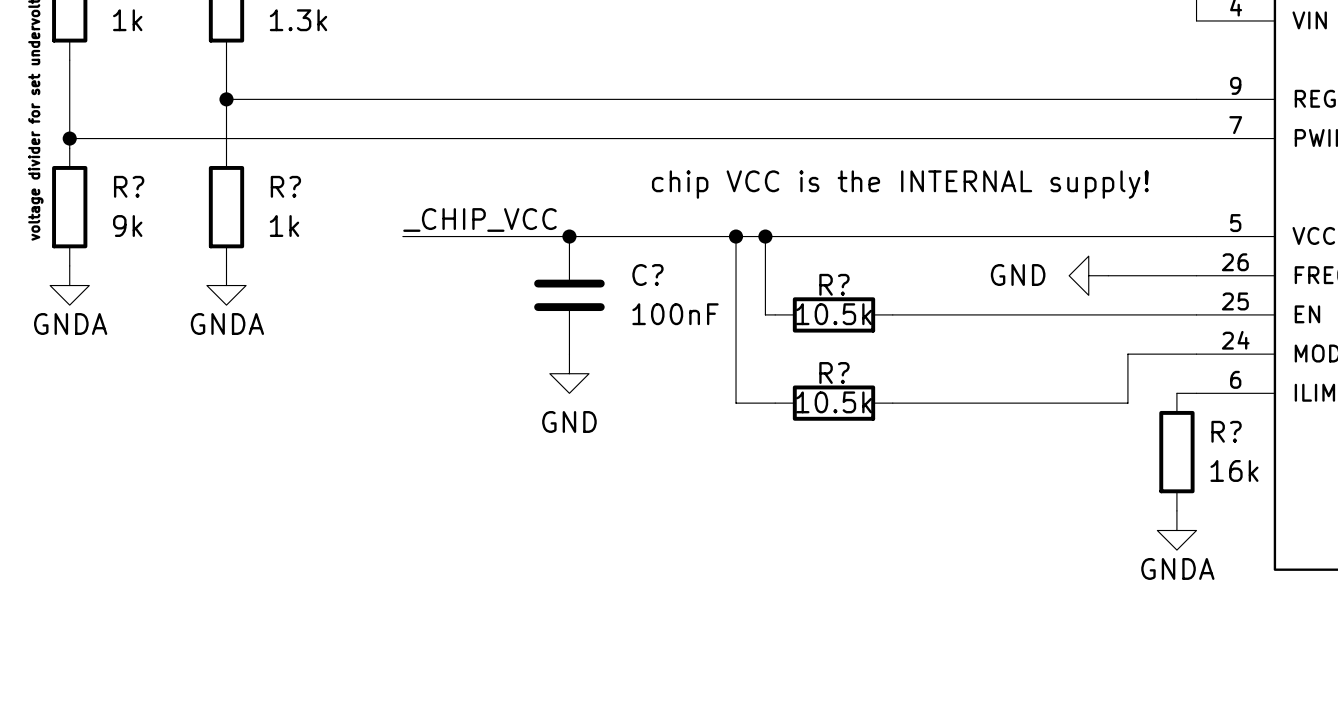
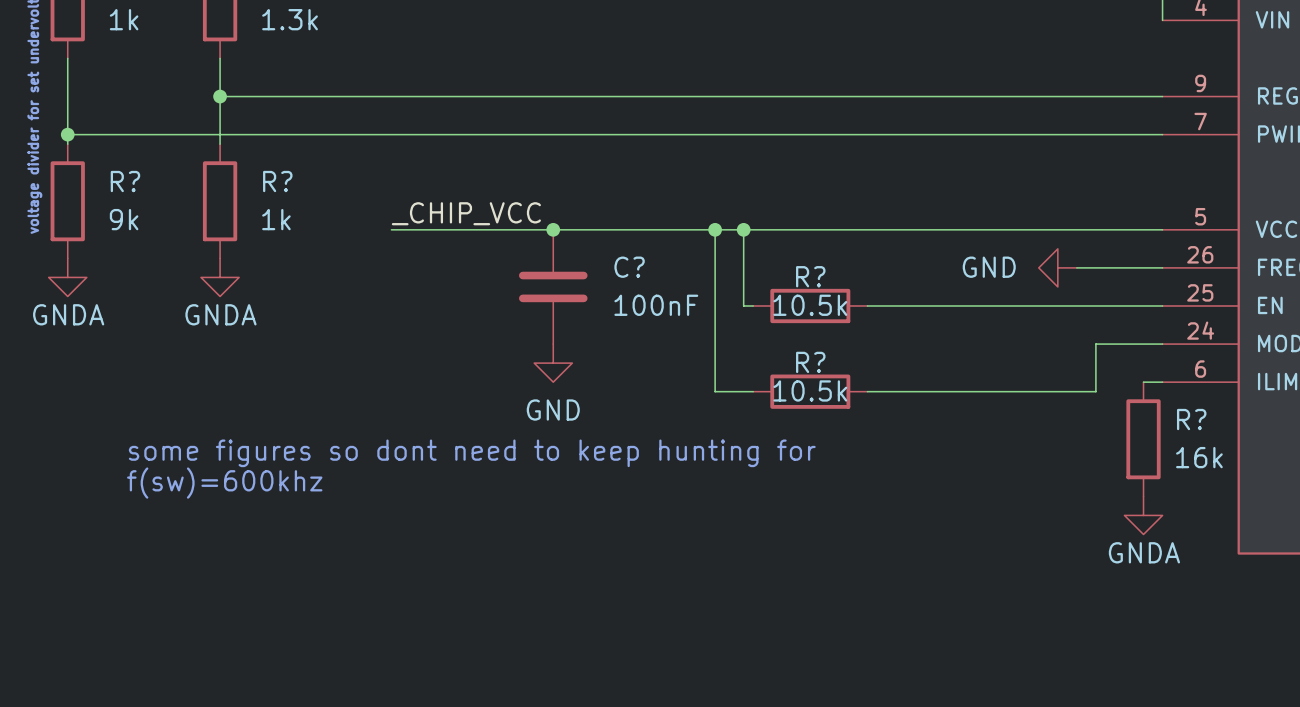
text: chip VCC is the INTERNAL supply! (900, 184) -> none
text: none -> some figures so dont need to keep hunting for (472, 453)
text: none -> f(sw)=600khz (224, 483)

